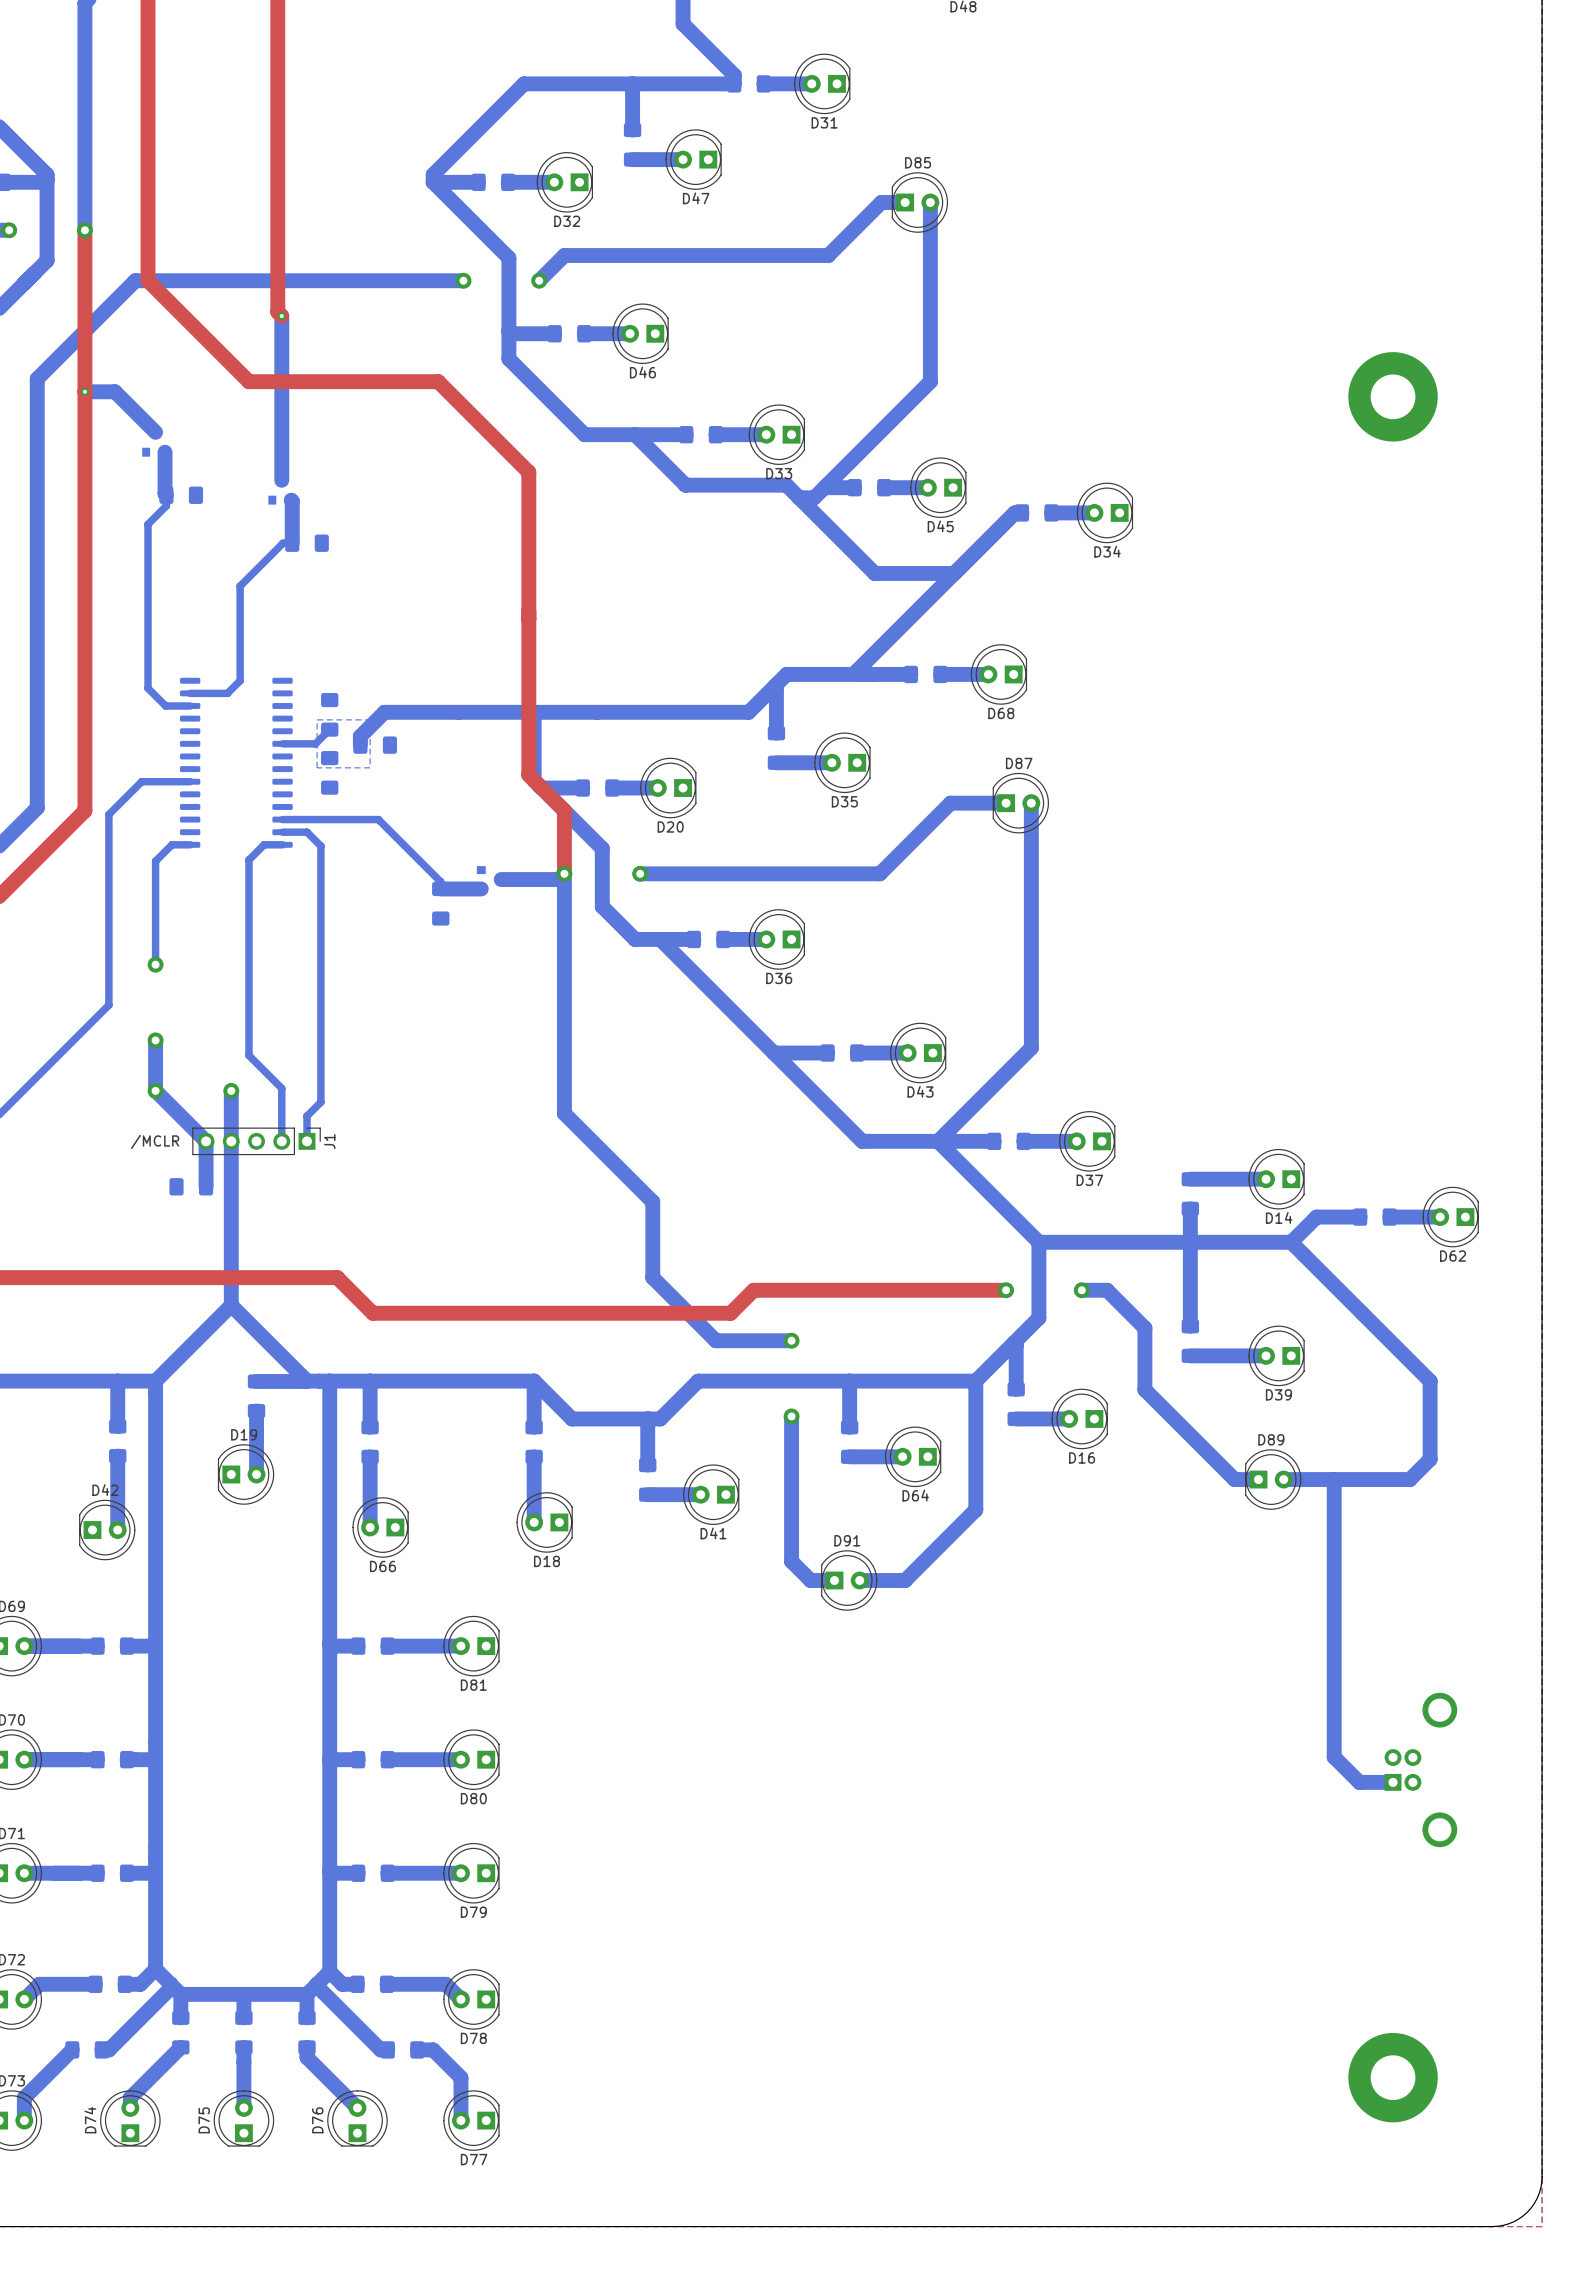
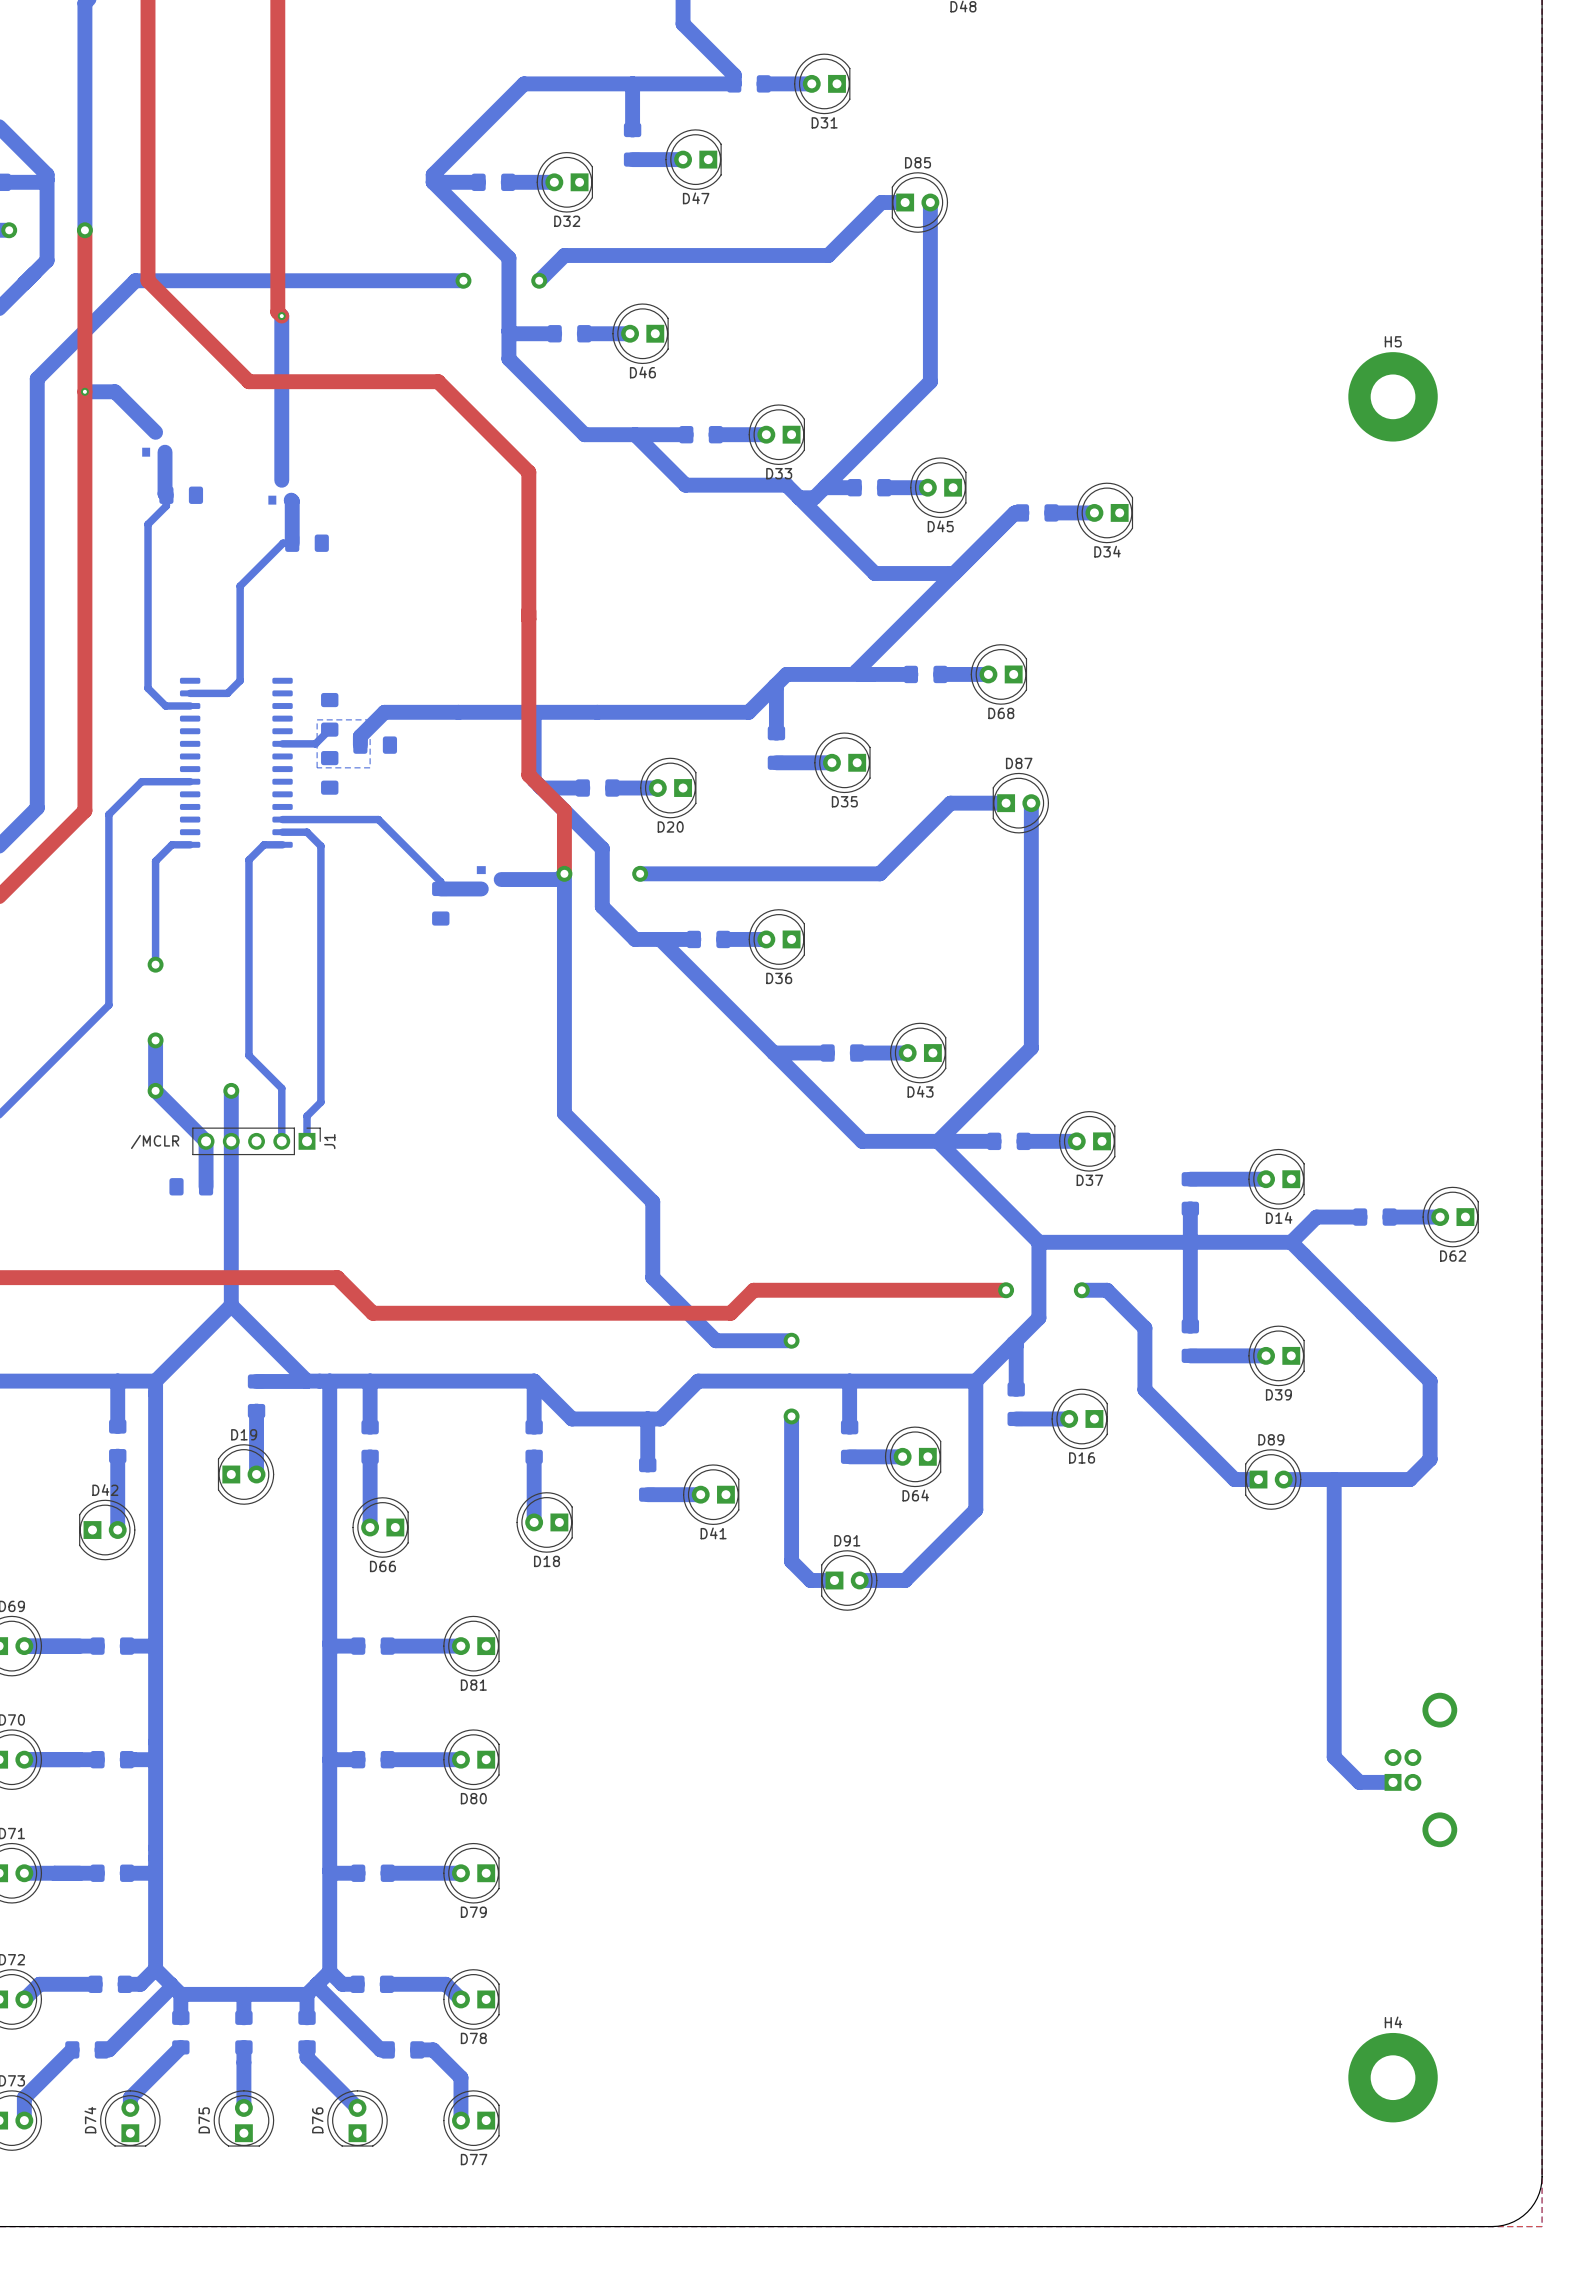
H5 name: none -> H5 (1393, 341)
H4 name: none -> H4 (1393, 2022)

